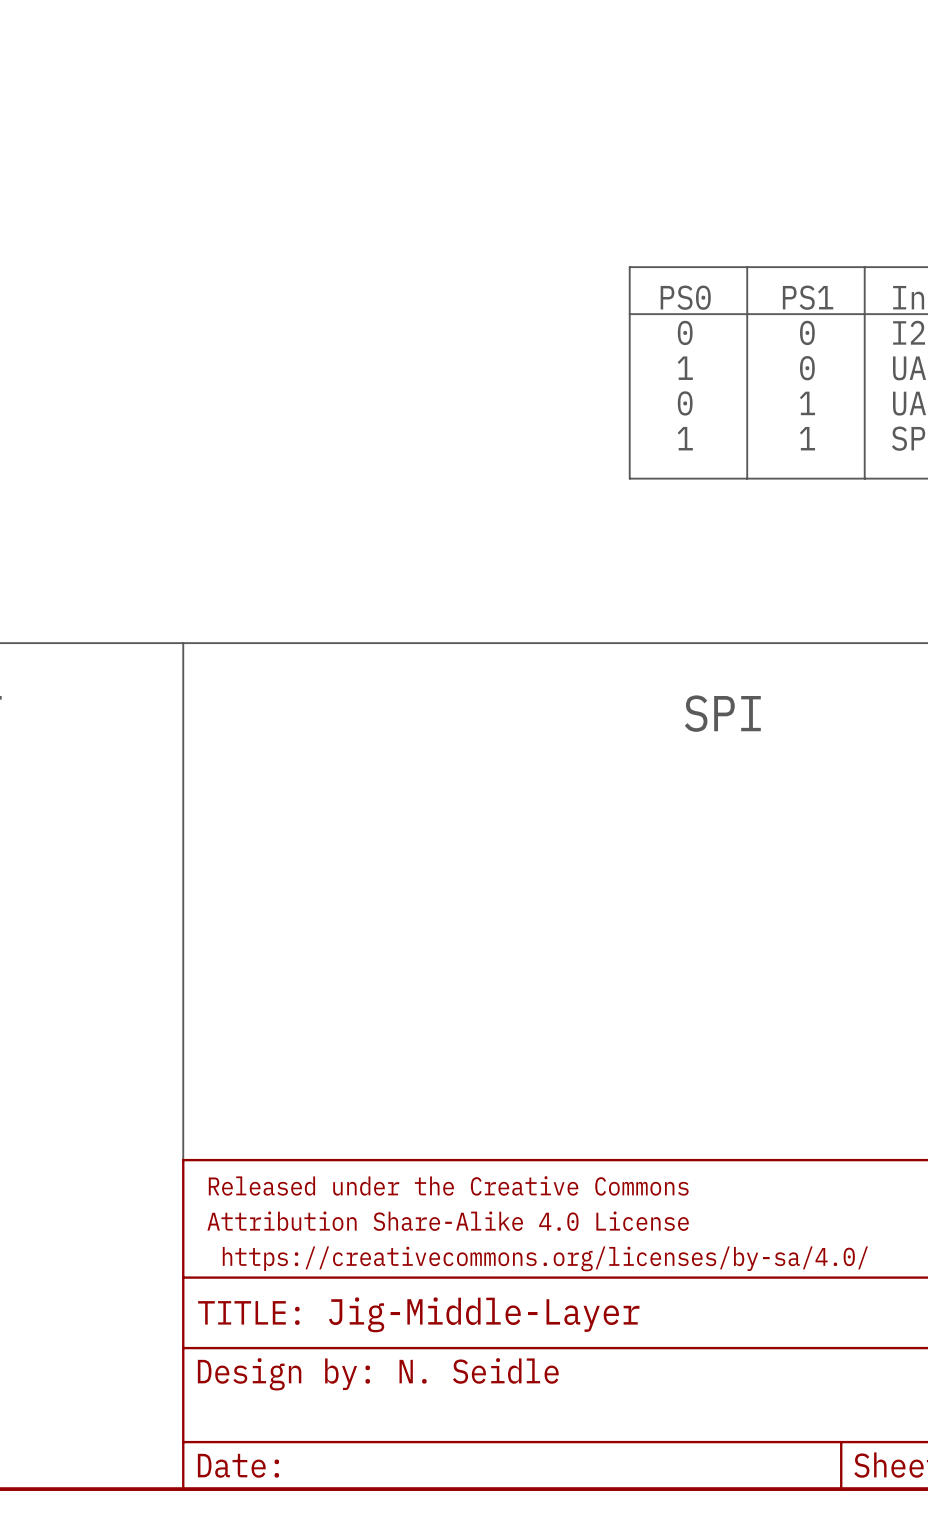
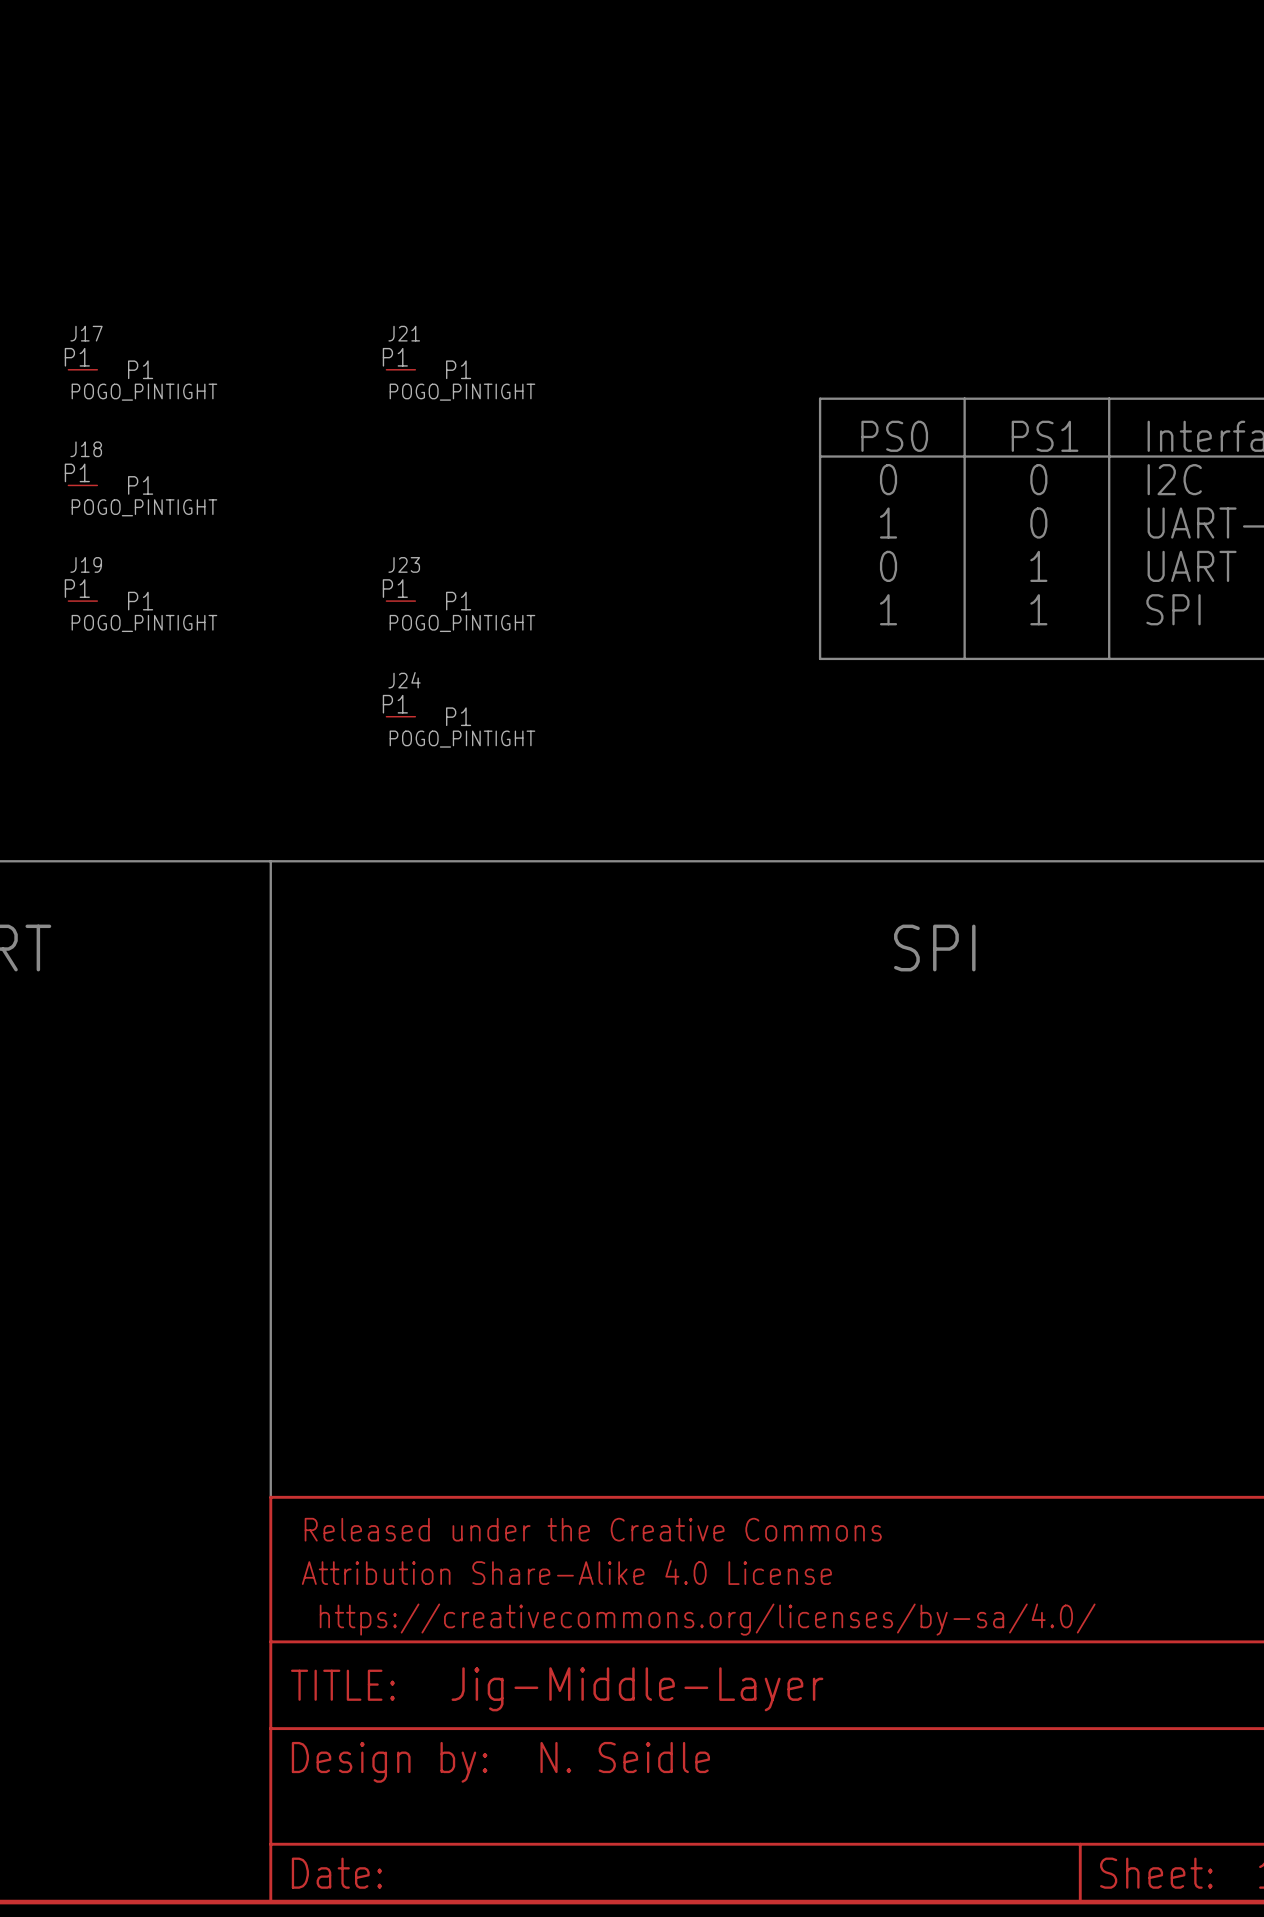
J17: none -> POGO_PINTIGHT (82, 369)
J21: none -> POGO_PINTIGHT (400, 369)
J18: none -> POGO_PINTIGHT (82, 485)
J19: none -> POGO_PINTIGHT (82, 601)
J23: none -> POGO_PINTIGHT (400, 601)
J24: none -> POGO_PINTIGHT (400, 716)

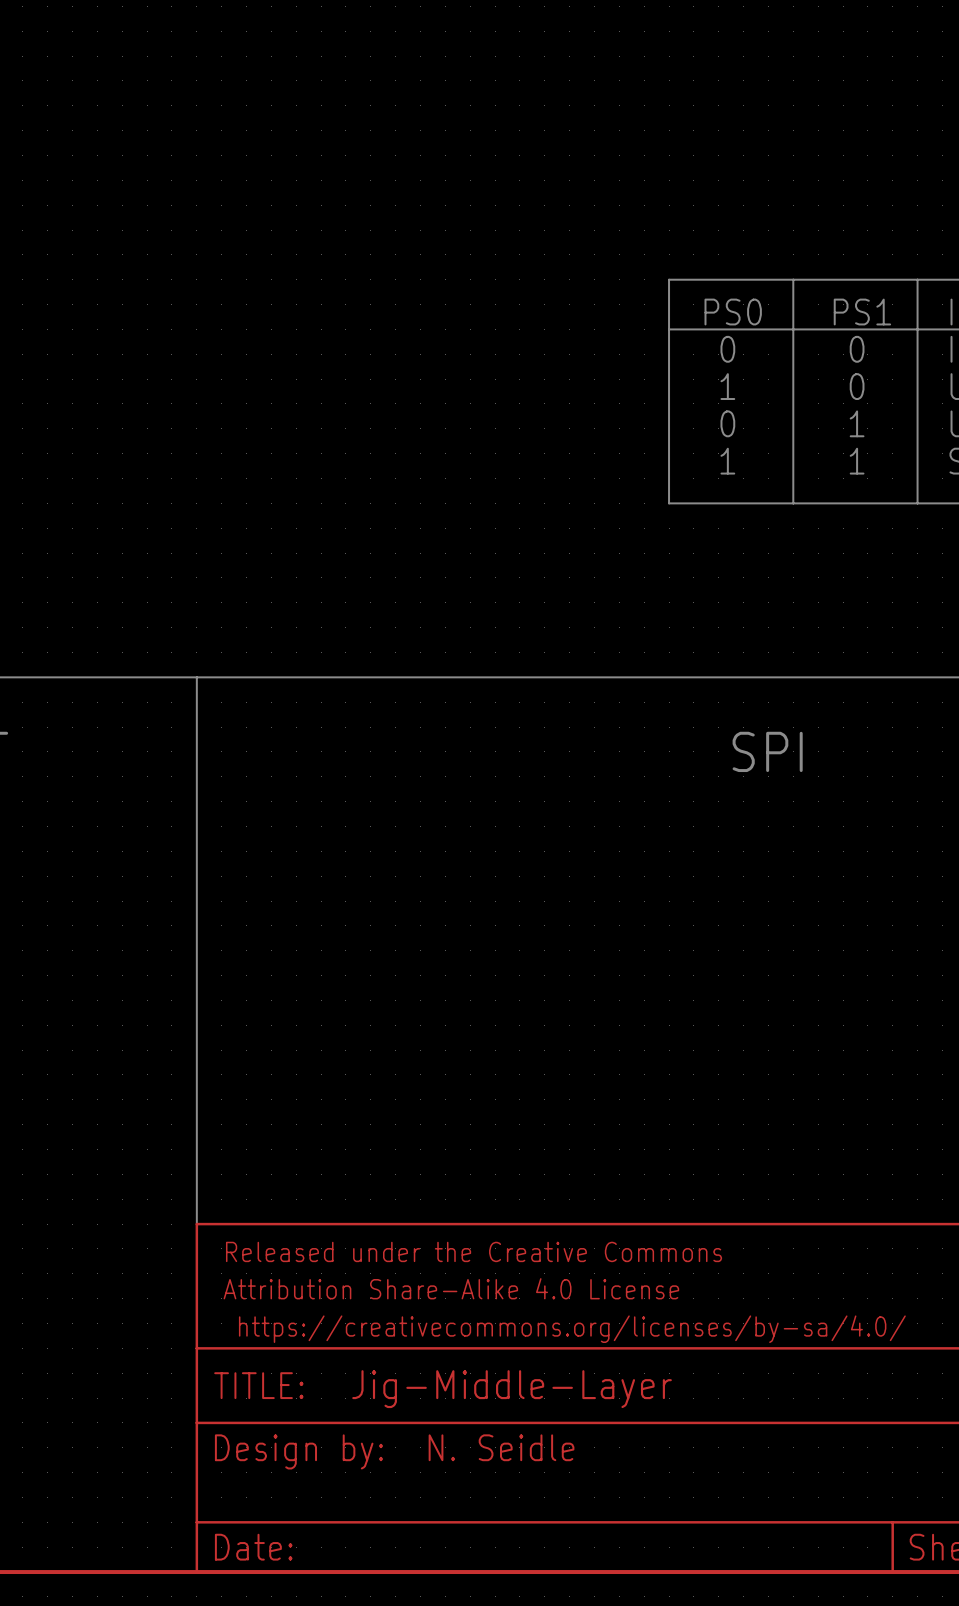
J17: POGO_PINTIGHT (82, 369) -> none
J21: POGO_PINTIGHT (400, 369) -> none
J18: POGO_PINTIGHT (82, 485) -> none
J19: POGO_PINTIGHT (82, 601) -> none
J23: POGO_PINTIGHT (400, 601) -> none
J24: POGO_PINTIGHT (400, 716) -> none

